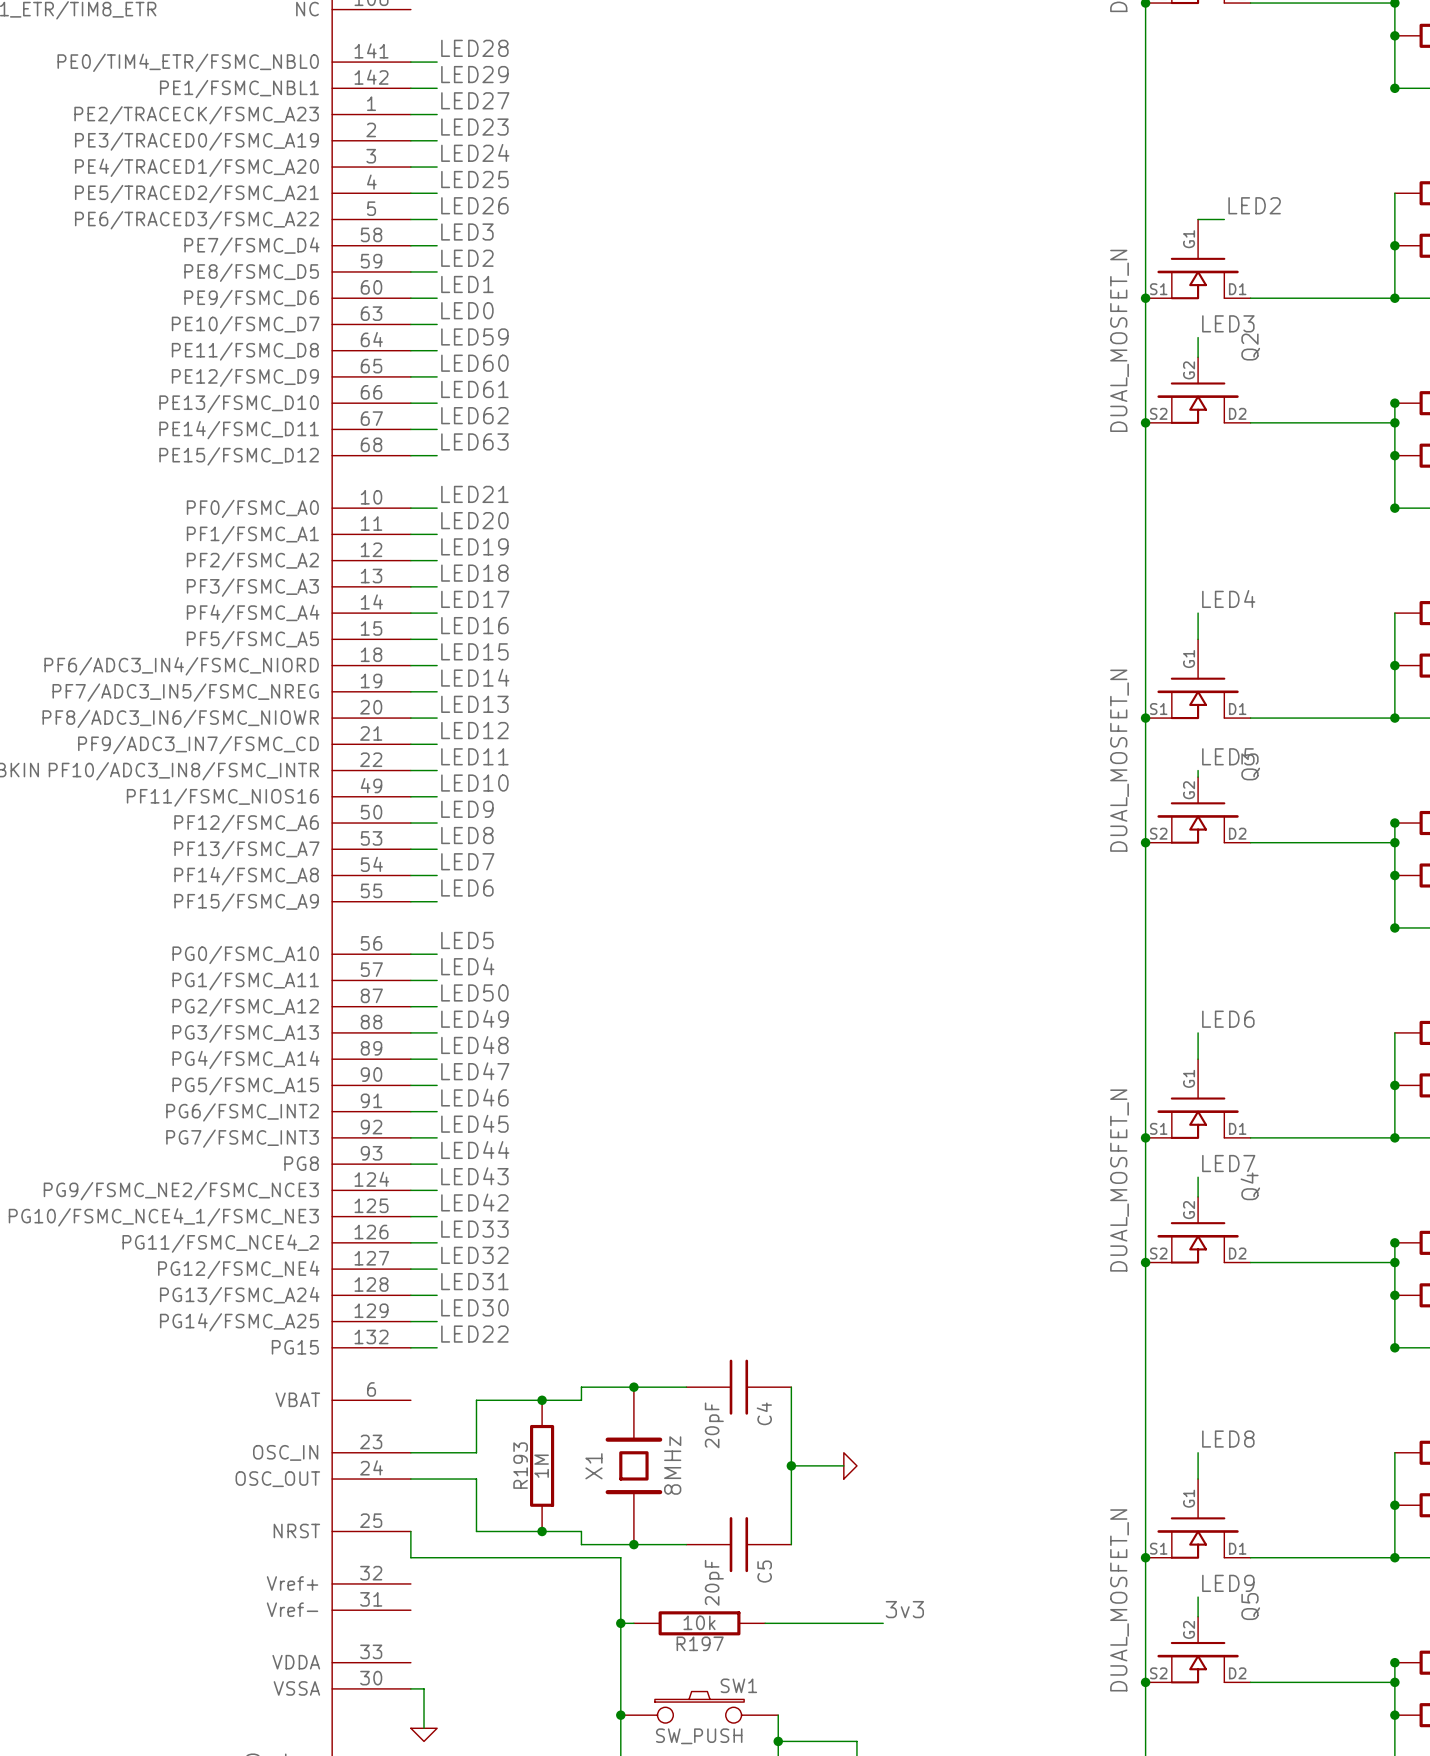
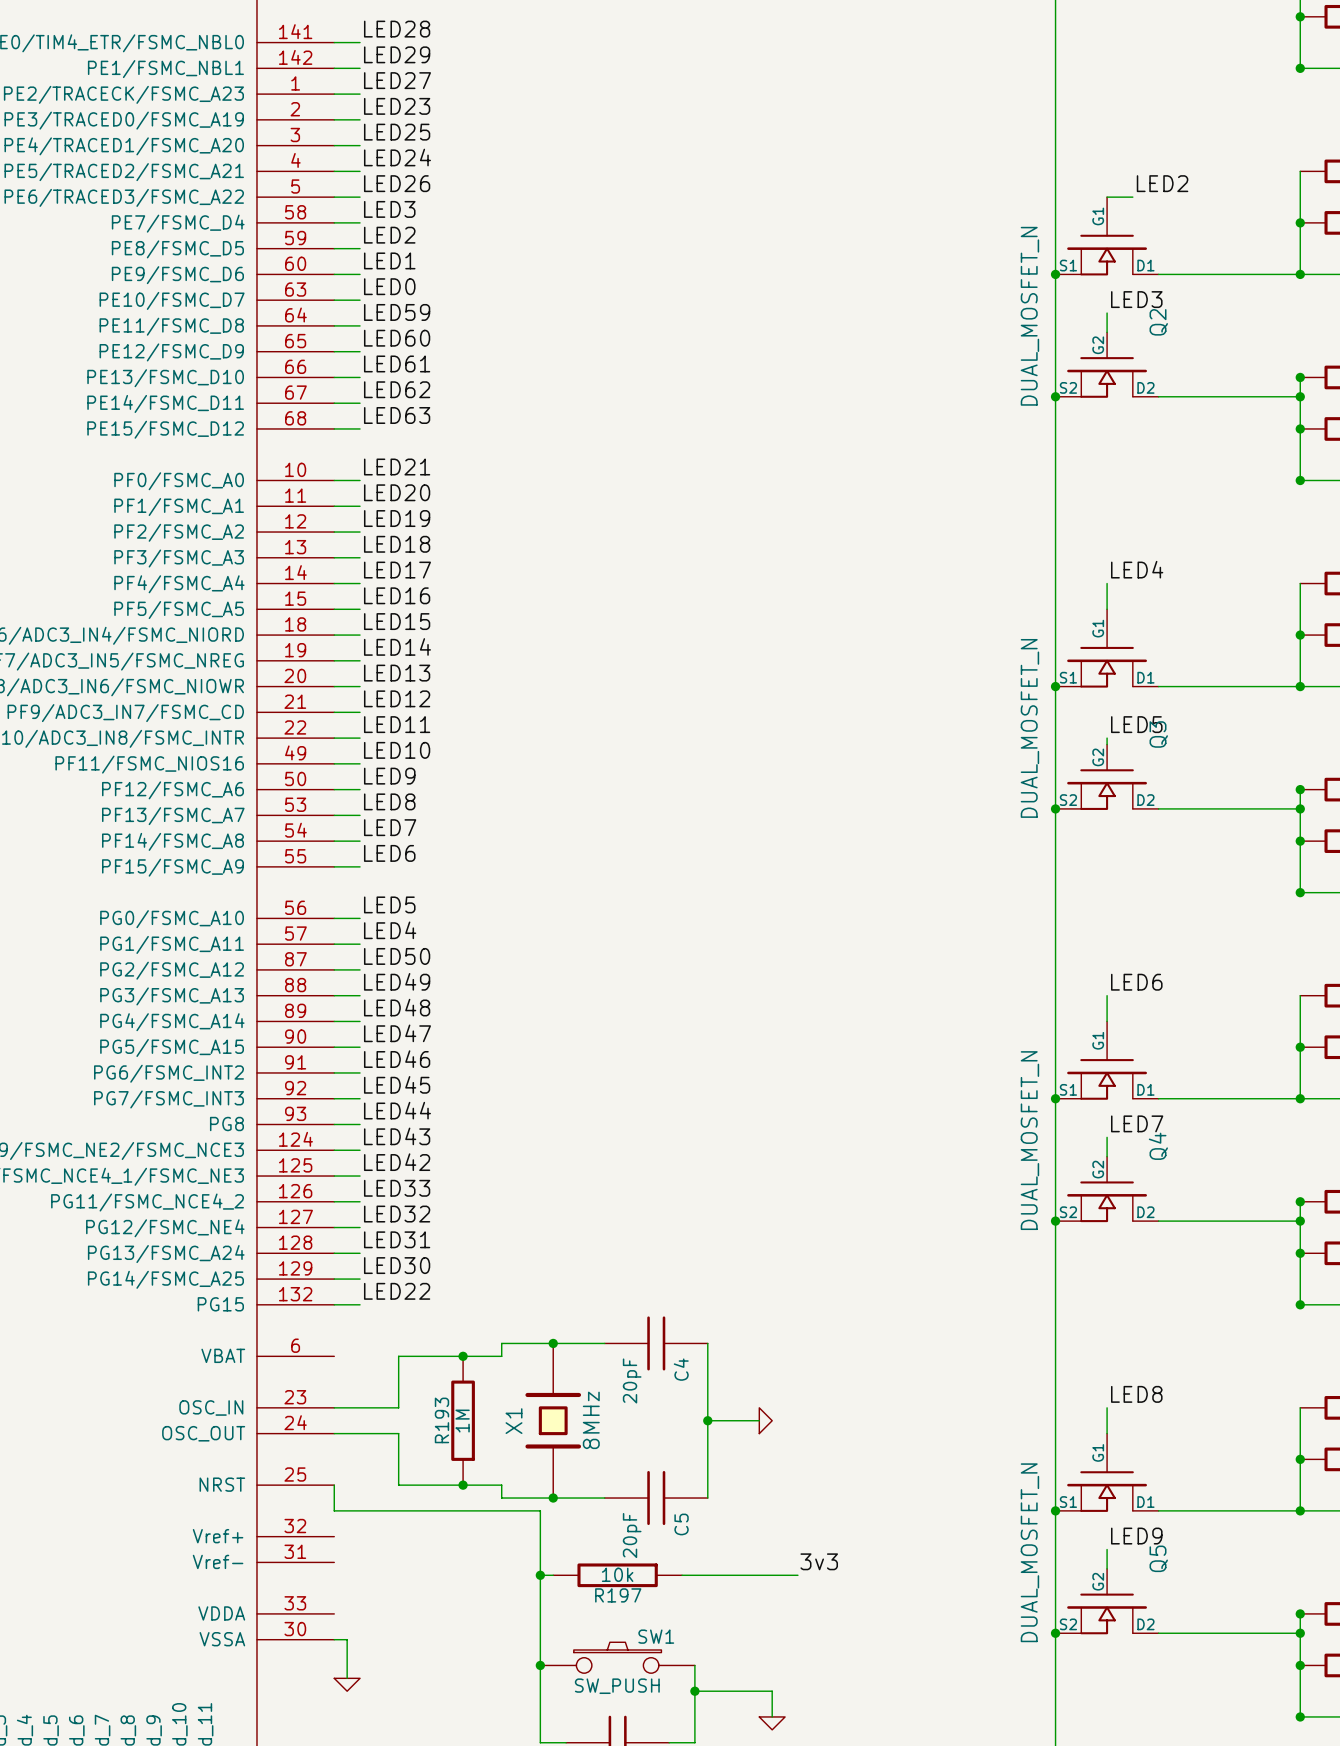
label: LED24 (475, 152) -> LED25 (397, 132)
label: LED25 (474, 179) -> LED24 (397, 157)

